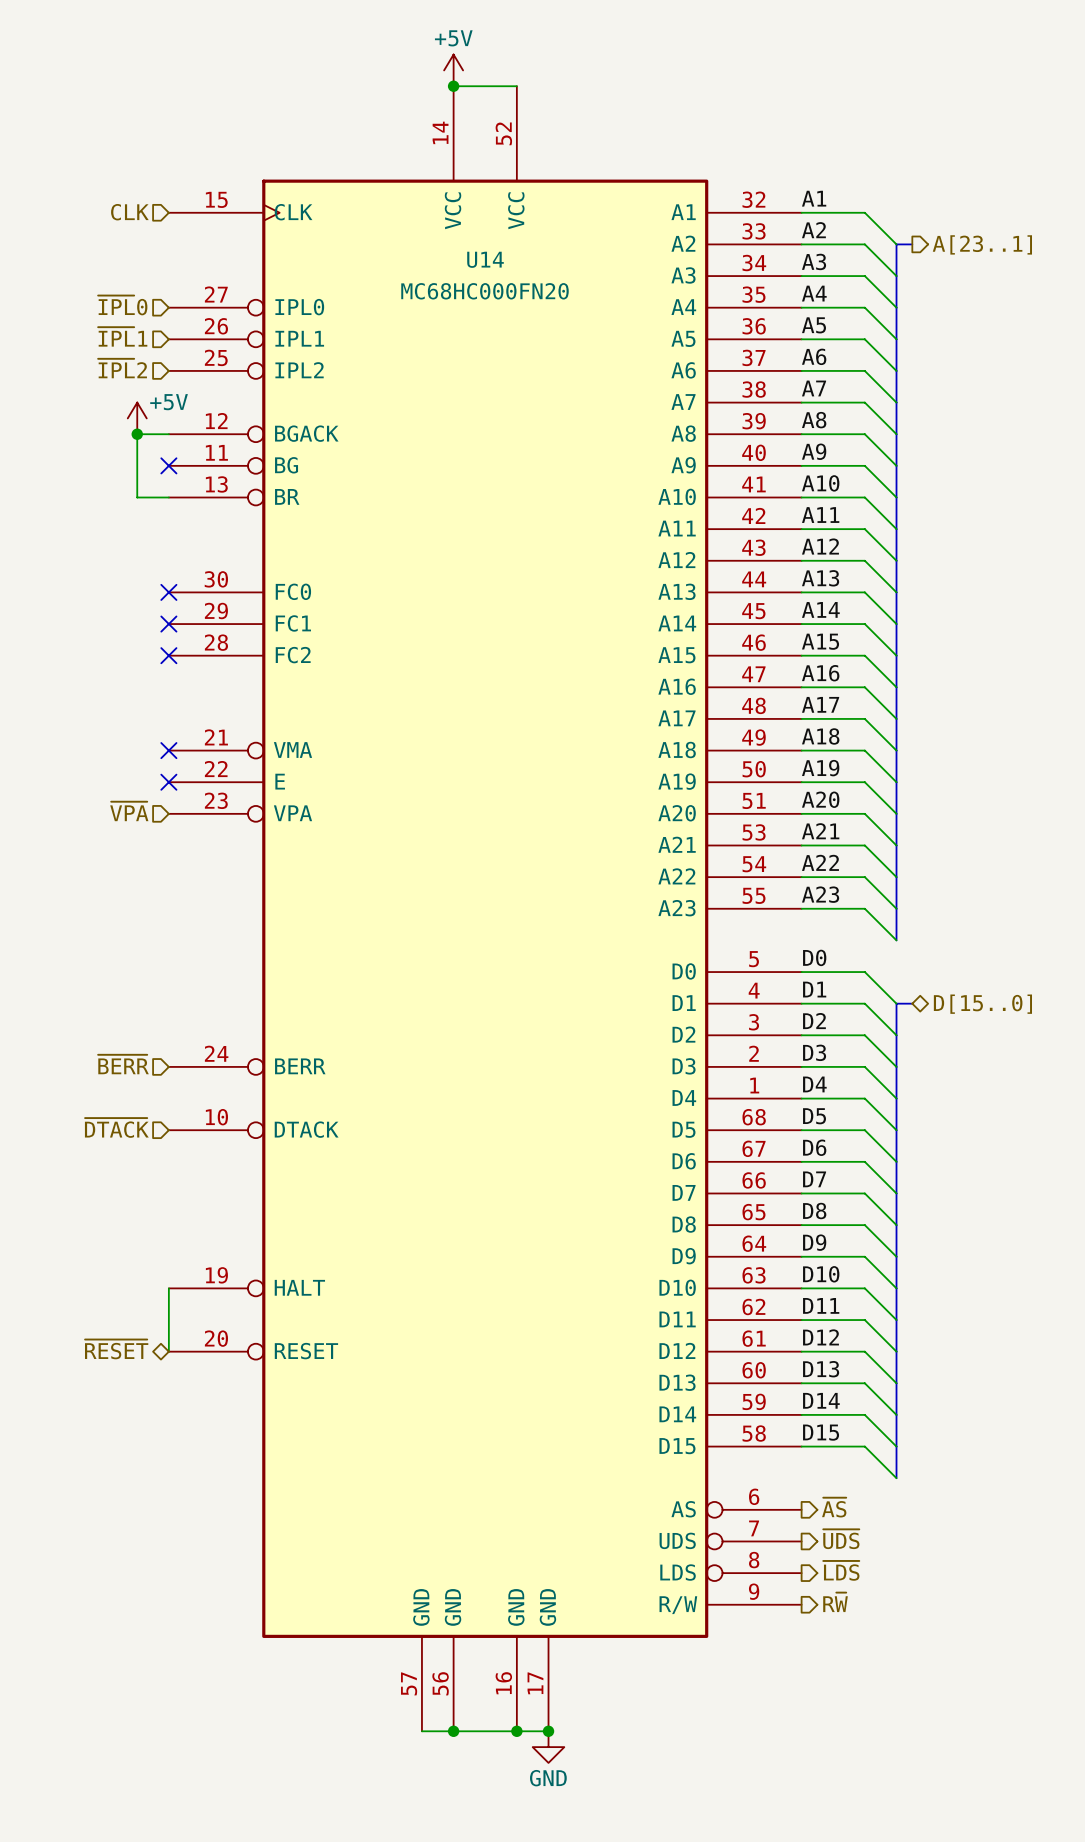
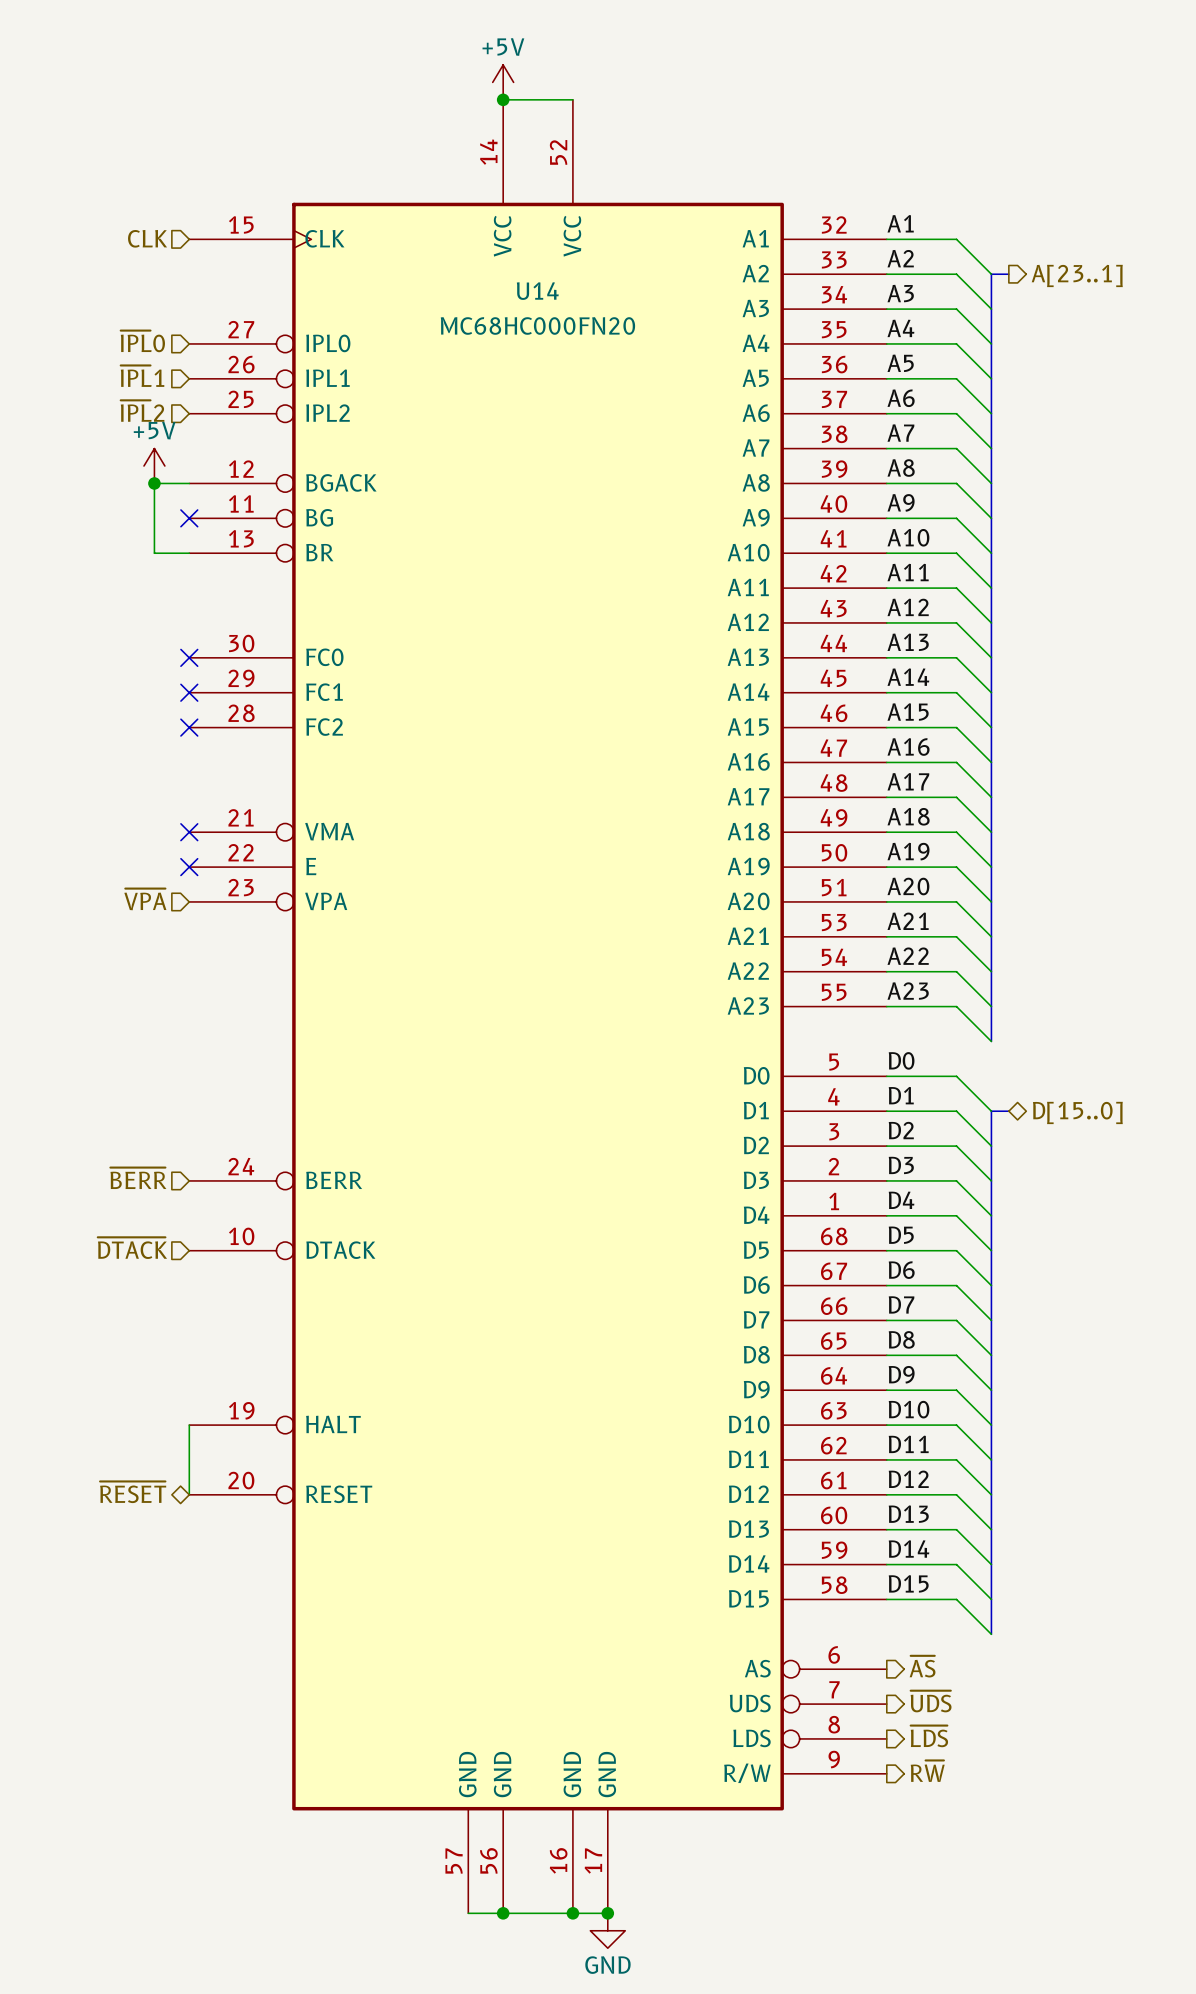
power symbol text position: +5V (169, 402) -> +5V (154, 430)

